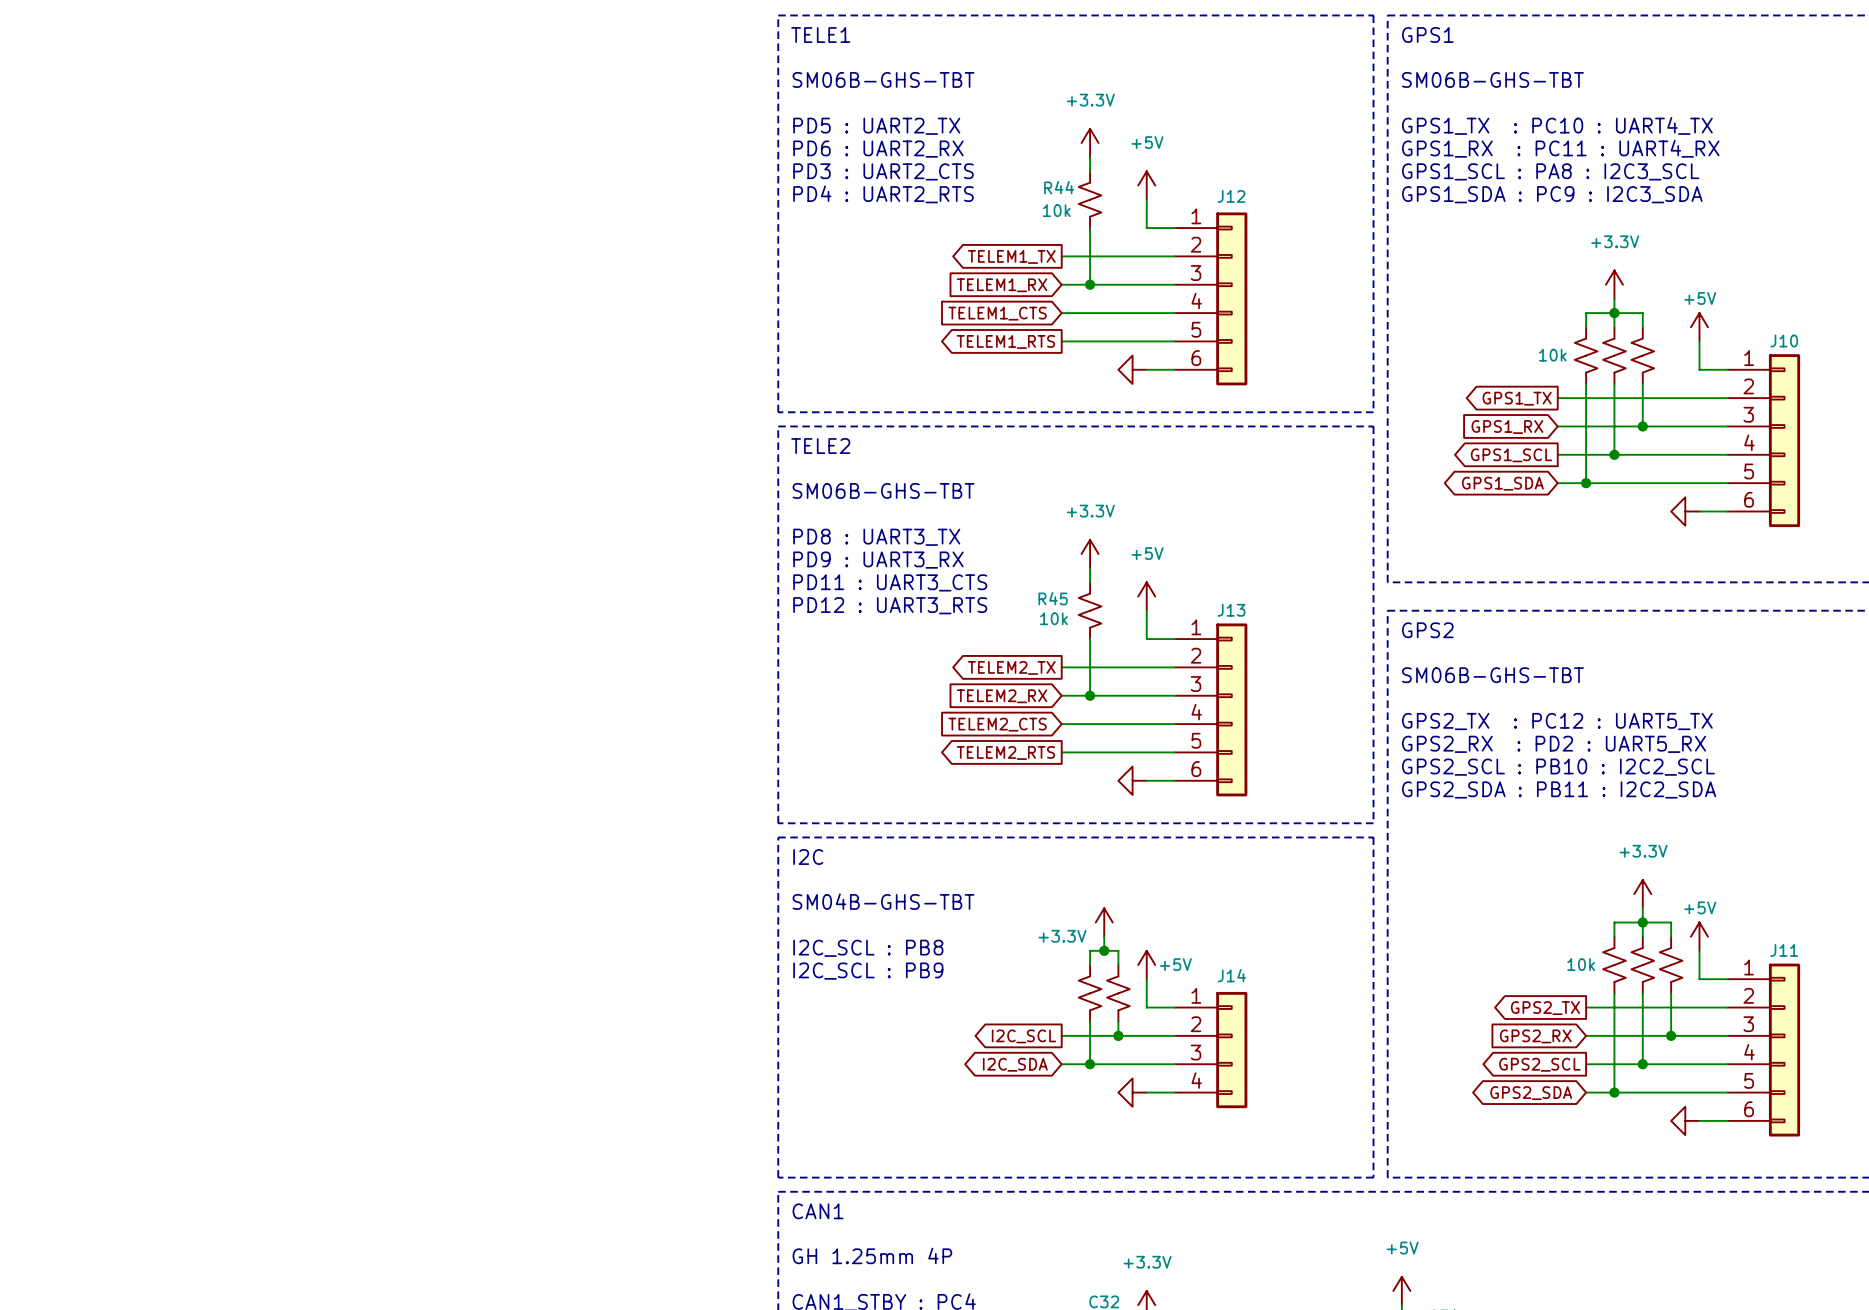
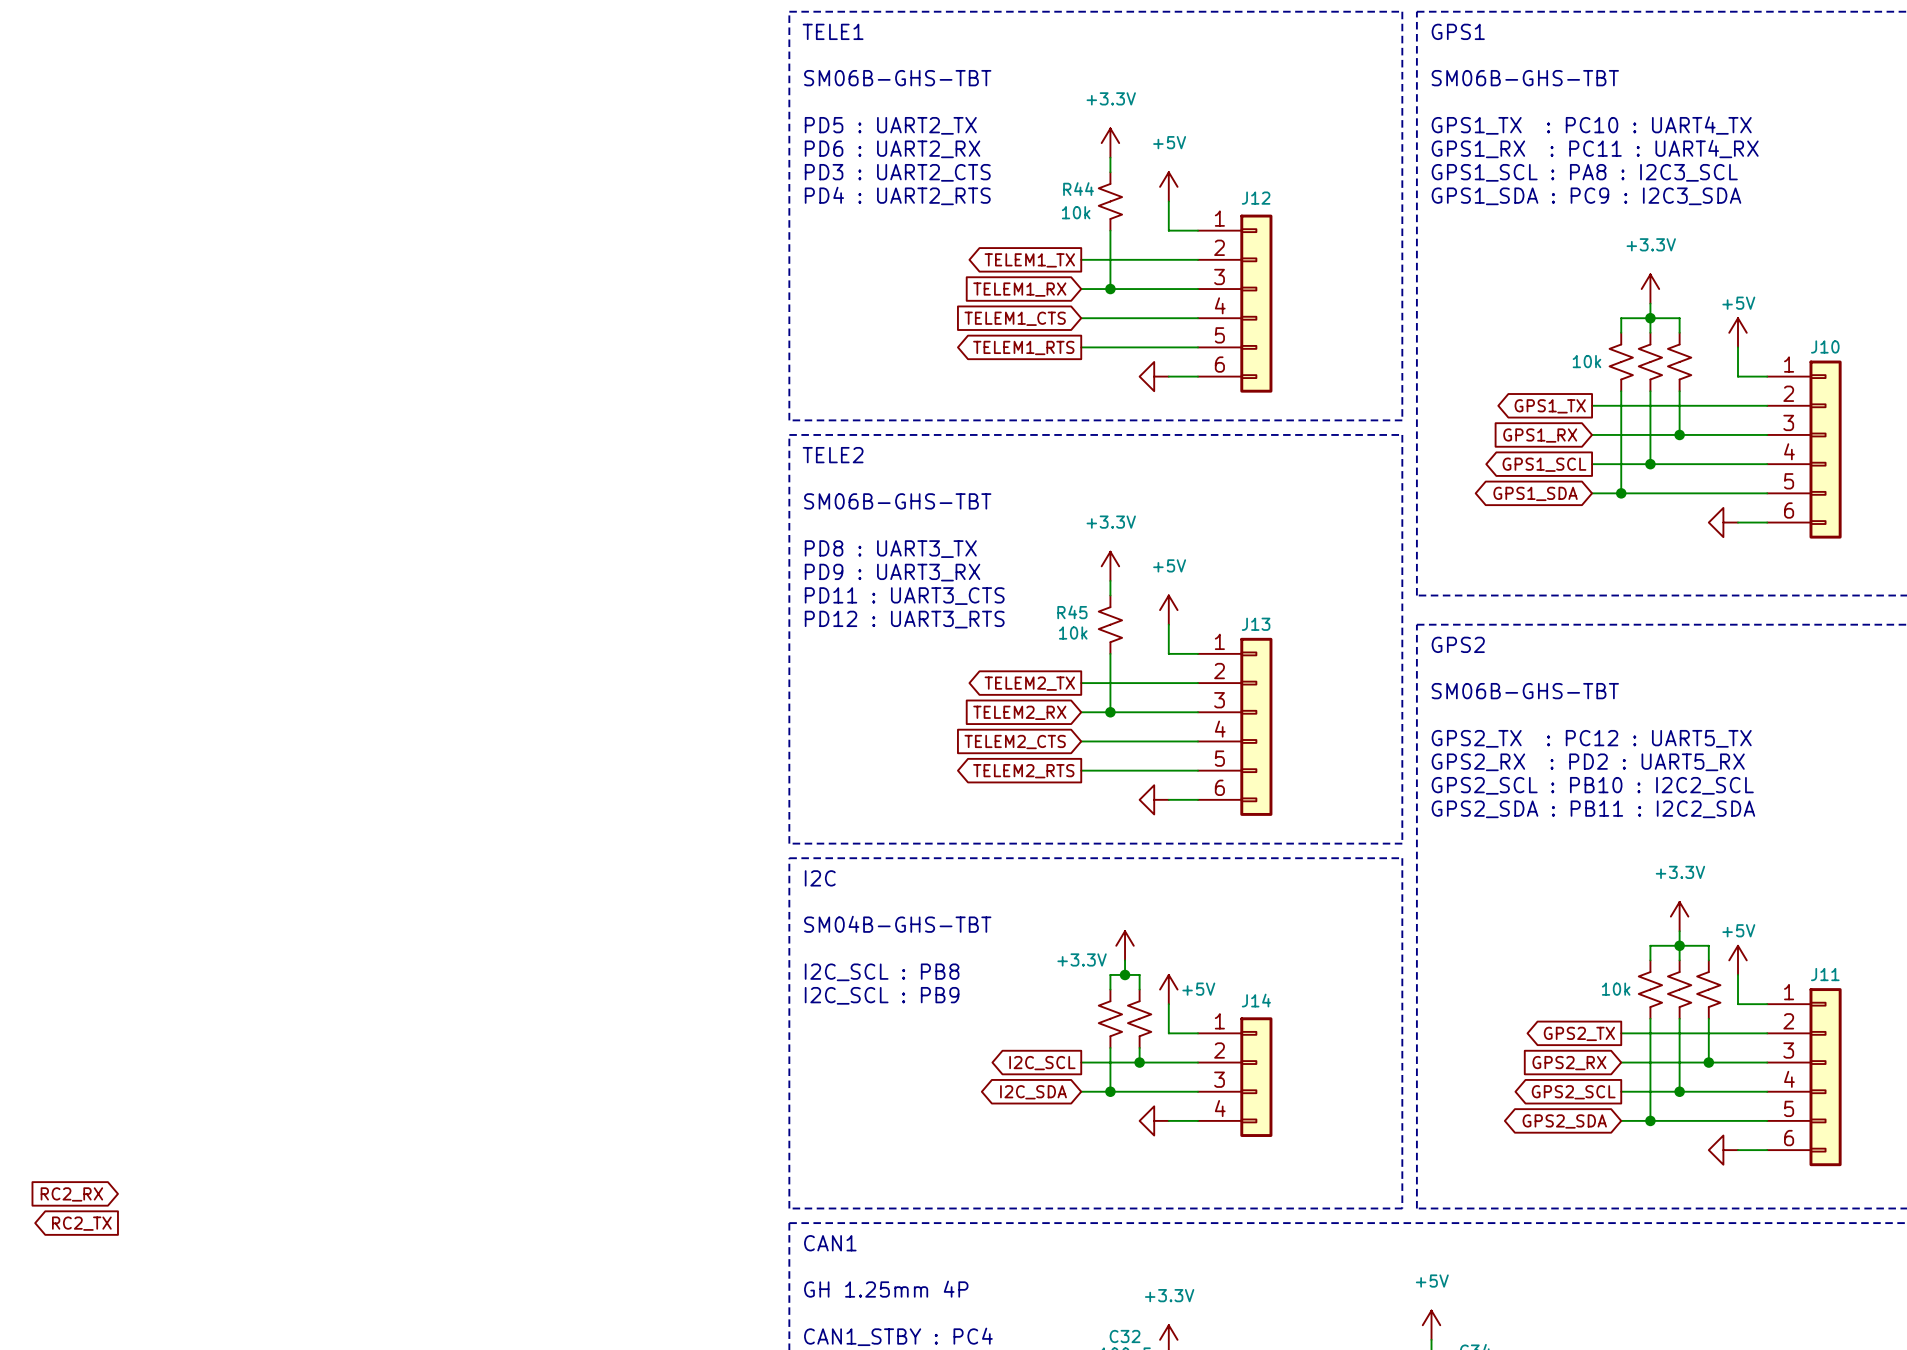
global label: none -> RC2_RX (71, 1194)
global label: none -> RC2_TX (81, 1223)

